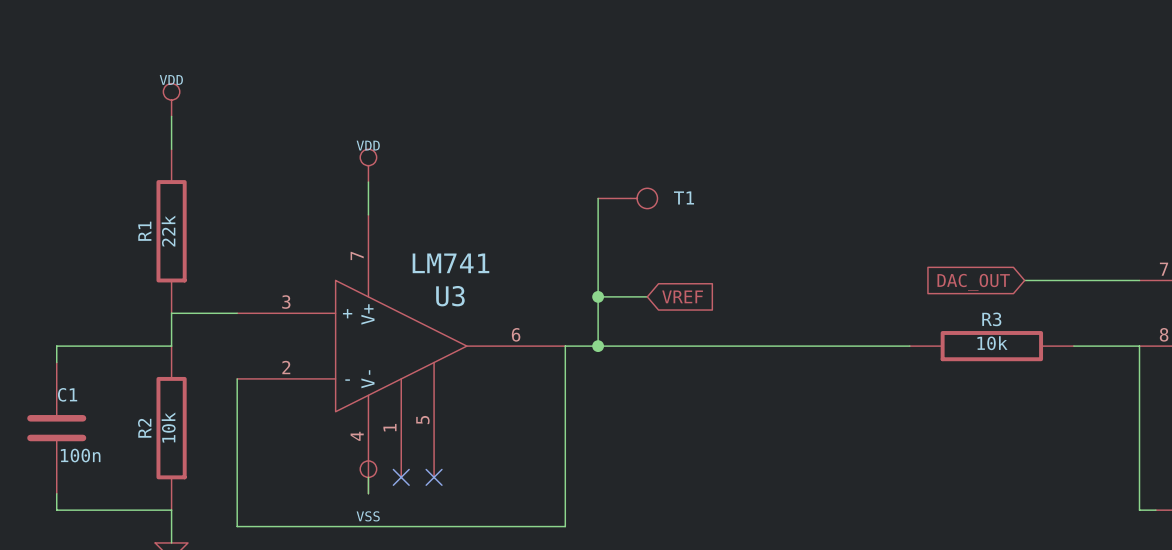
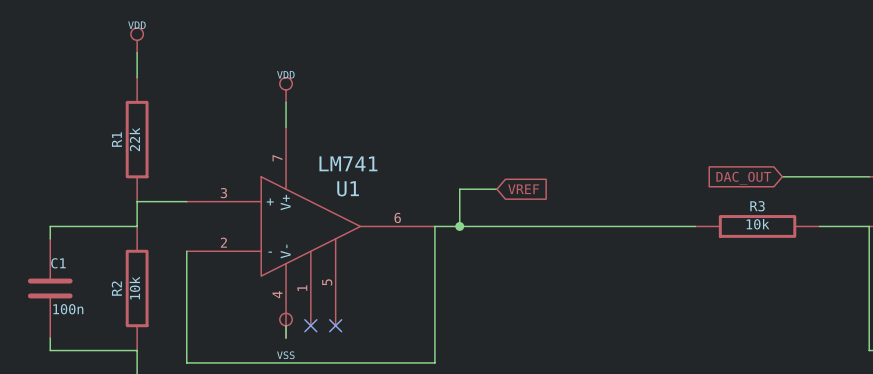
wire: (598, 198) (598, 296) -> none
T1: (627, 198) -> none
U3 name: U3 (450, 296) -> U1 (348, 188)
junction: (598, 296) -> none

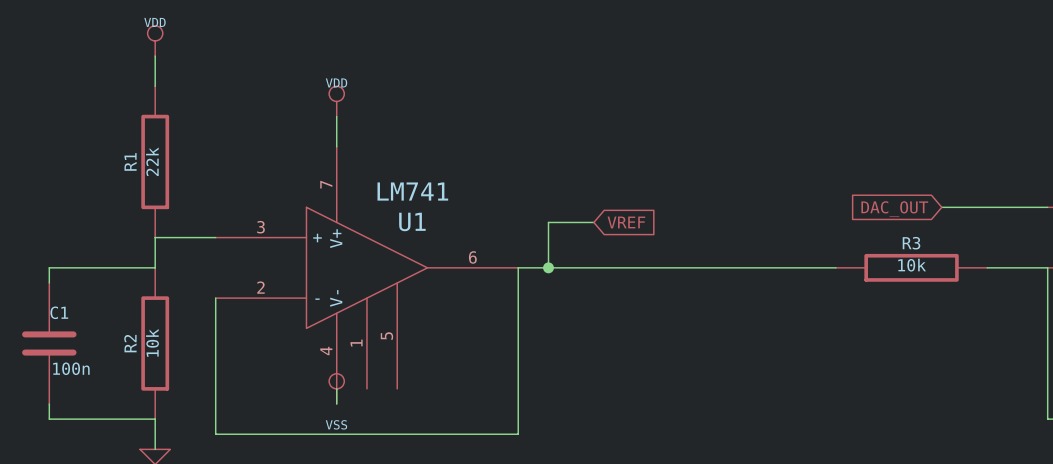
no-connect mark: (310, 325) -> none
no-connect mark: (335, 325) -> none

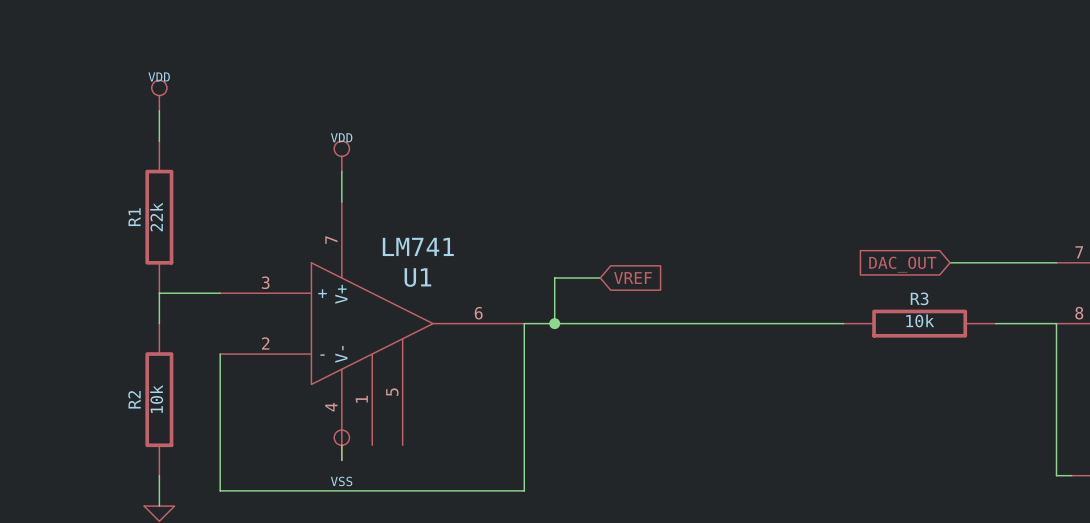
wire: (155, 267) (49, 267) (49, 282) -> none
C1: 100n (49, 343) -> none
wire: (49, 403) (49, 419) (155, 419) -> none

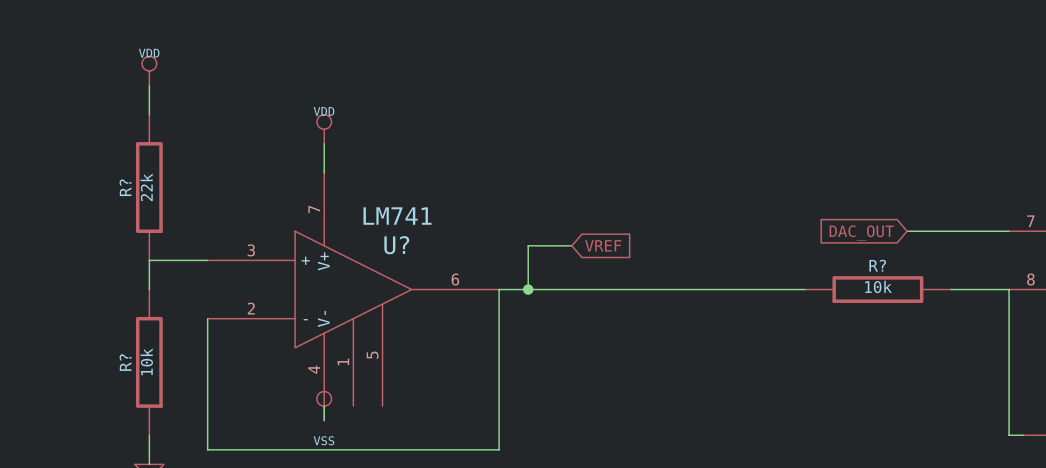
R1 name: R1 (134, 217) -> R? (125, 187)
U1 name: U1 (417, 277) -> U? (396, 245)
R3 name: R3 (919, 298) -> R? (877, 265)
R2 name: R2 (134, 399) -> R? (125, 362)

